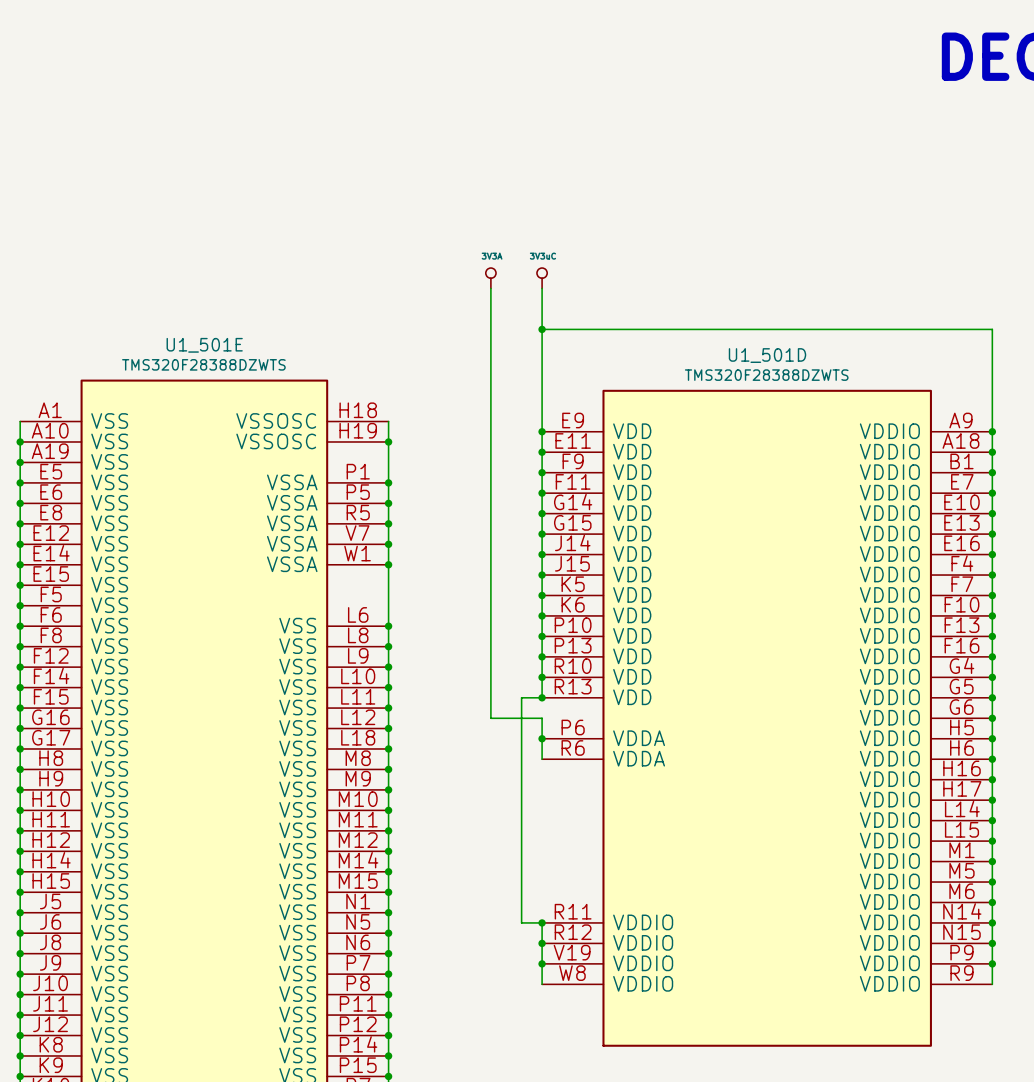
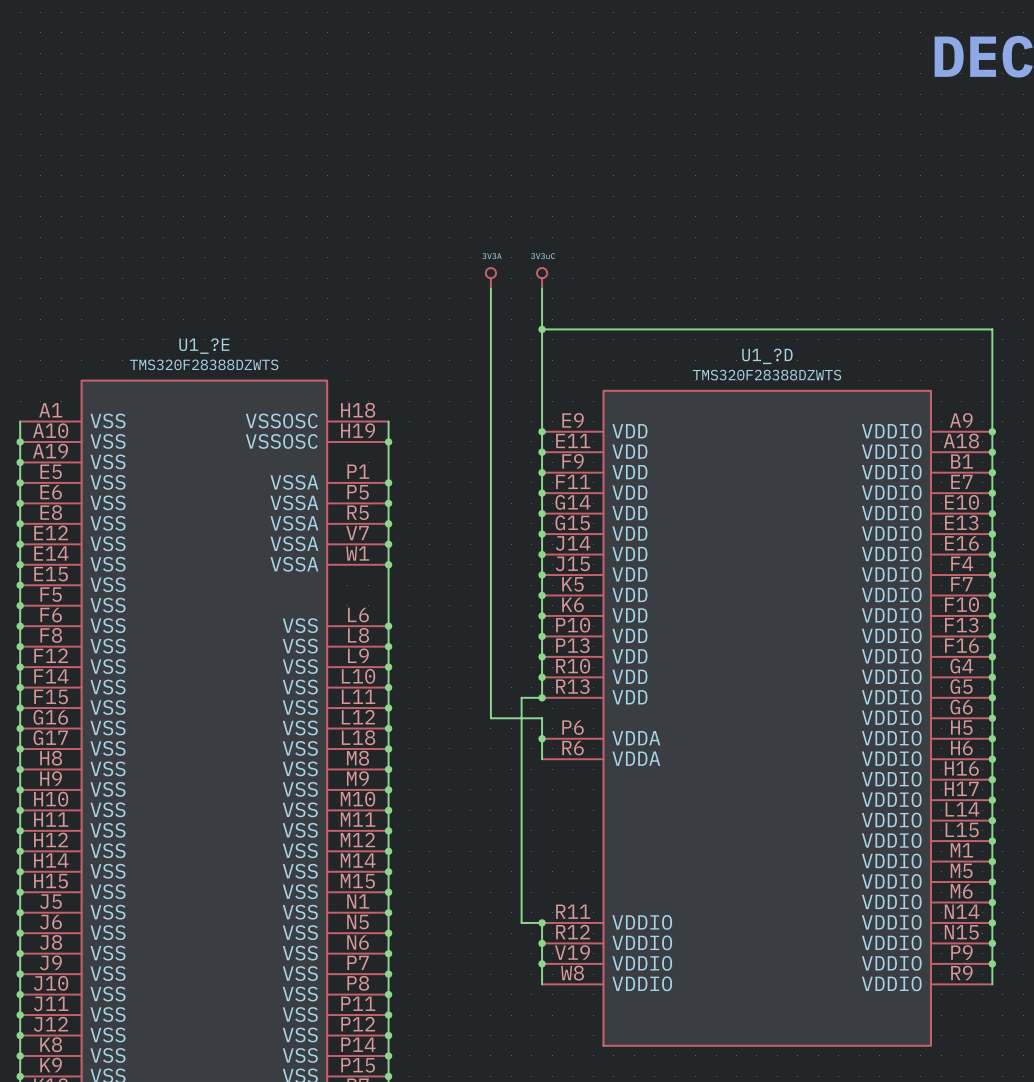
U1_501E name: U1_501E (204, 345) -> U1_?E (204, 346)
U1_501D name: U1_501D (767, 355) -> U1_?D (767, 356)

